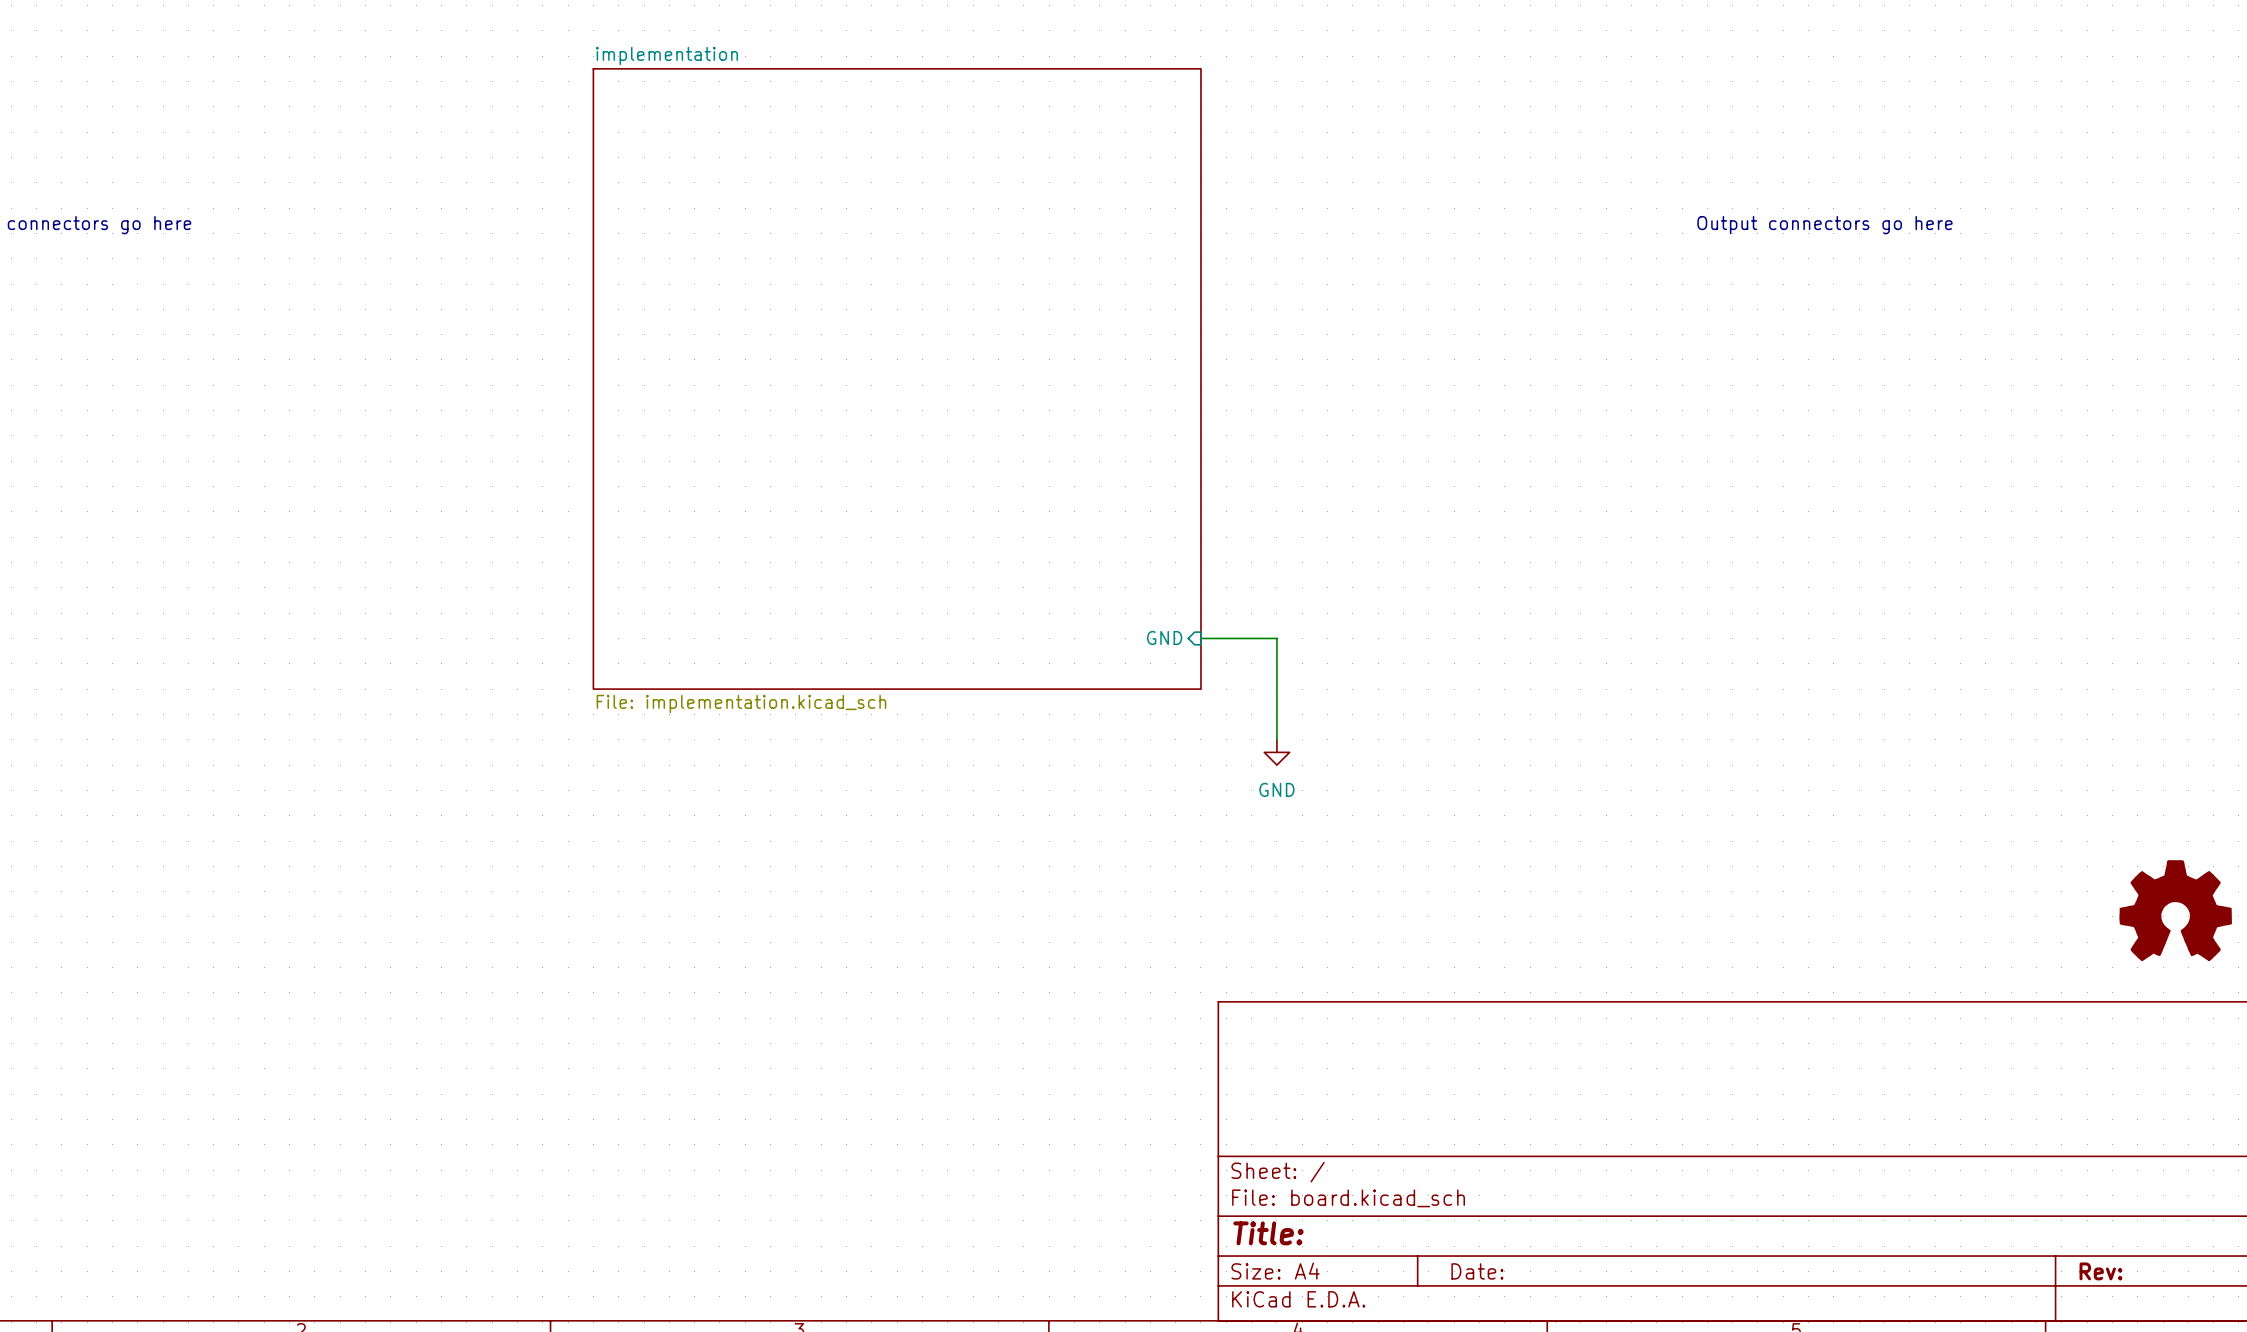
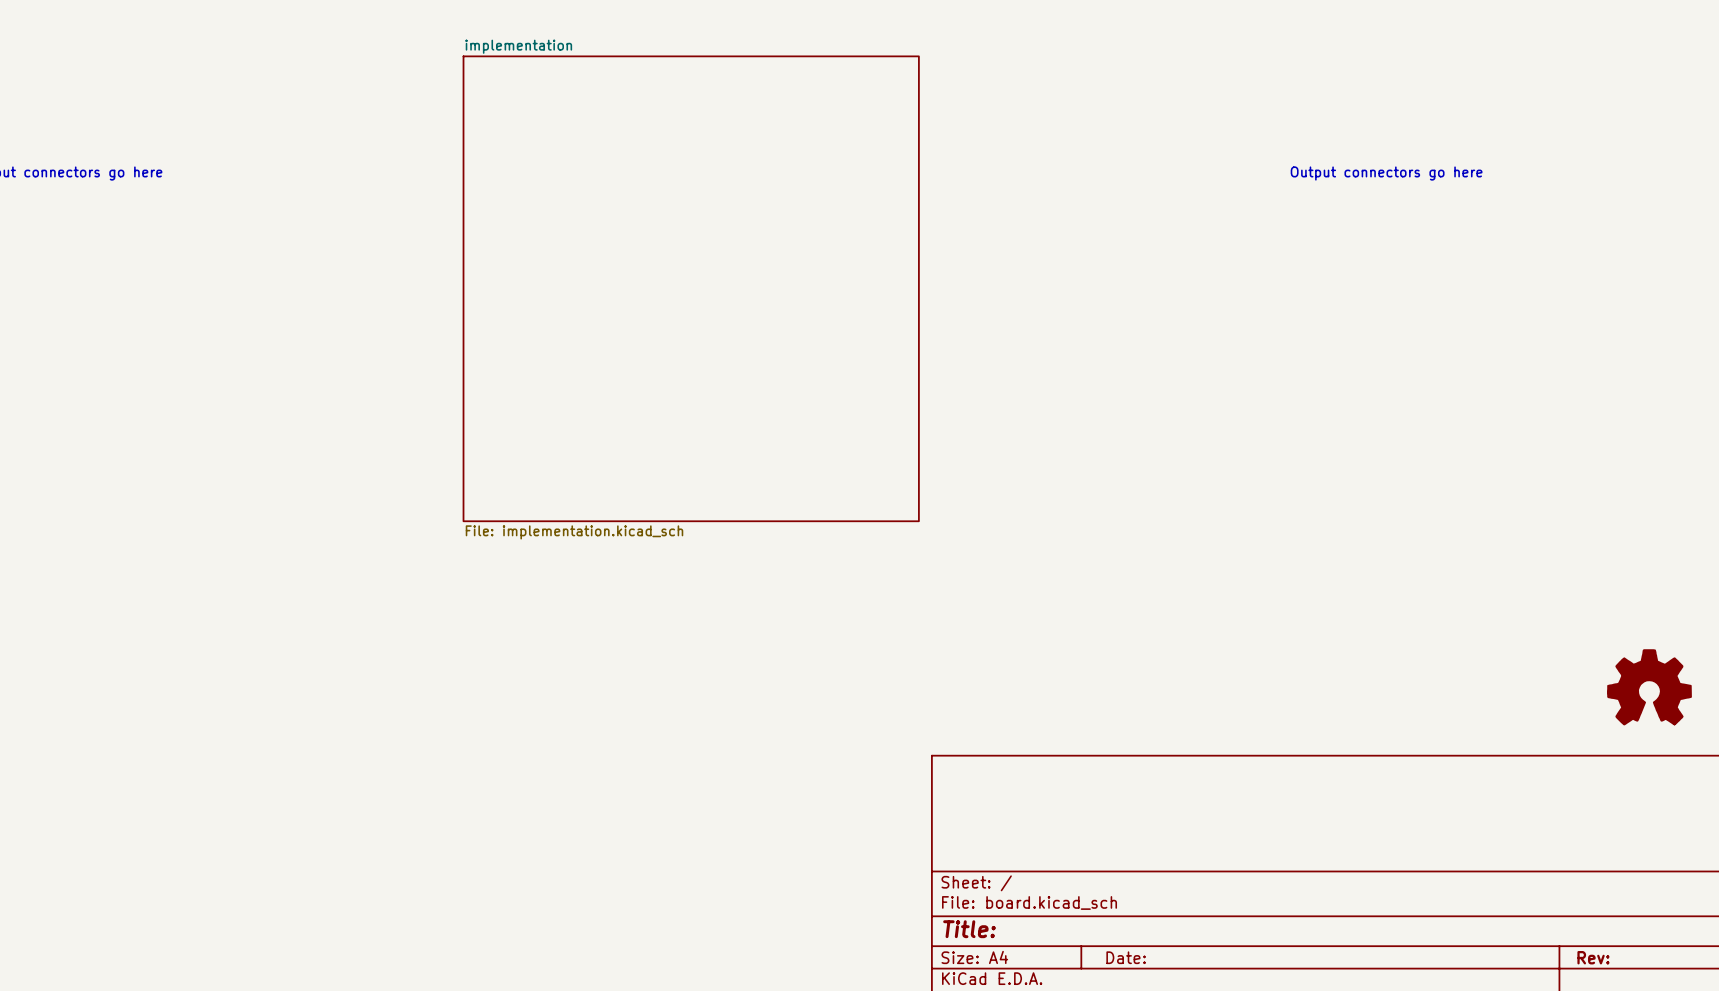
sheet pin: GND (1164, 637) -> none
wire: (1200, 638) (1276, 638) (1276, 739) -> none
power symbol: GND (1276, 752) -> none

